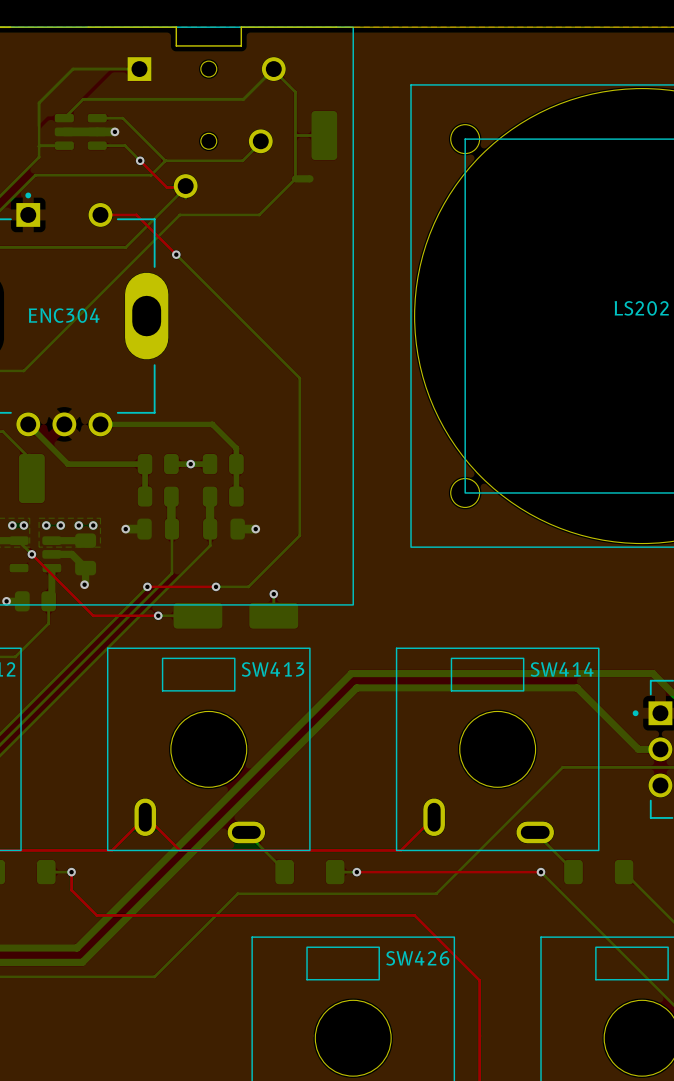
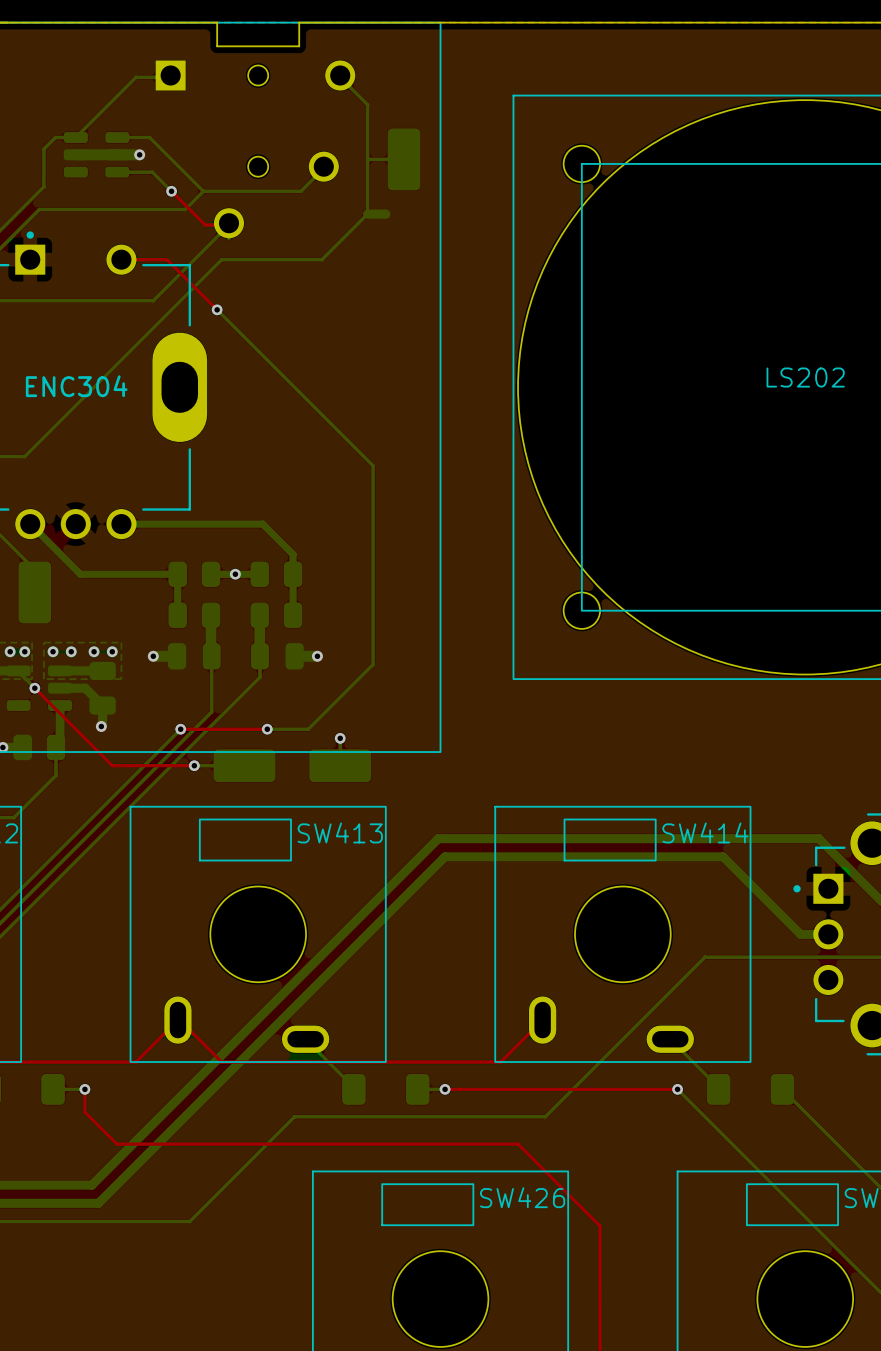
bottom track: (139, 69) (73, 69) (39, 103) (39, 127) -> (75, 137) (55, 137) (43, 149)
bottom track: (273, 69) (243, 99) (83, 99) -> (170, 77) (136, 77) (99, 113)
bottom track: (64, 145) (39, 146) -> none

